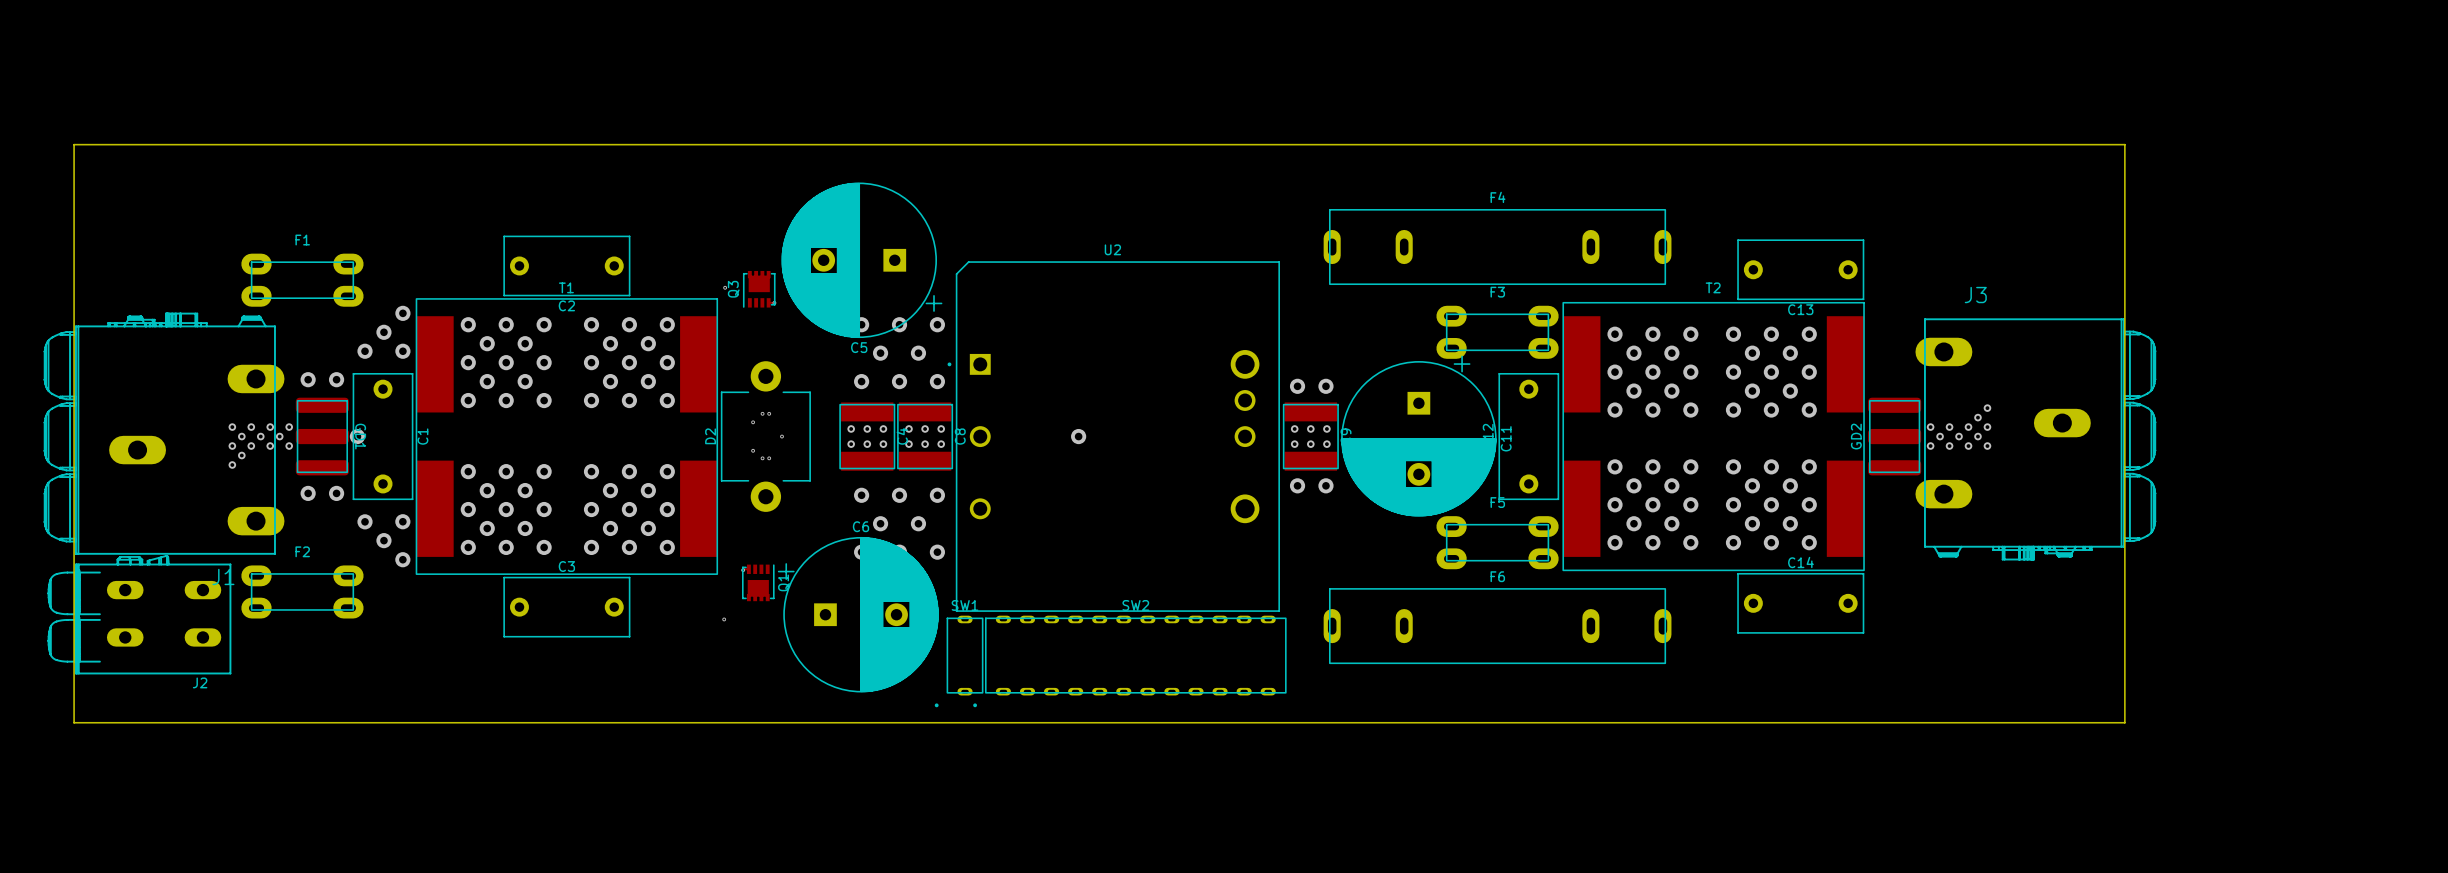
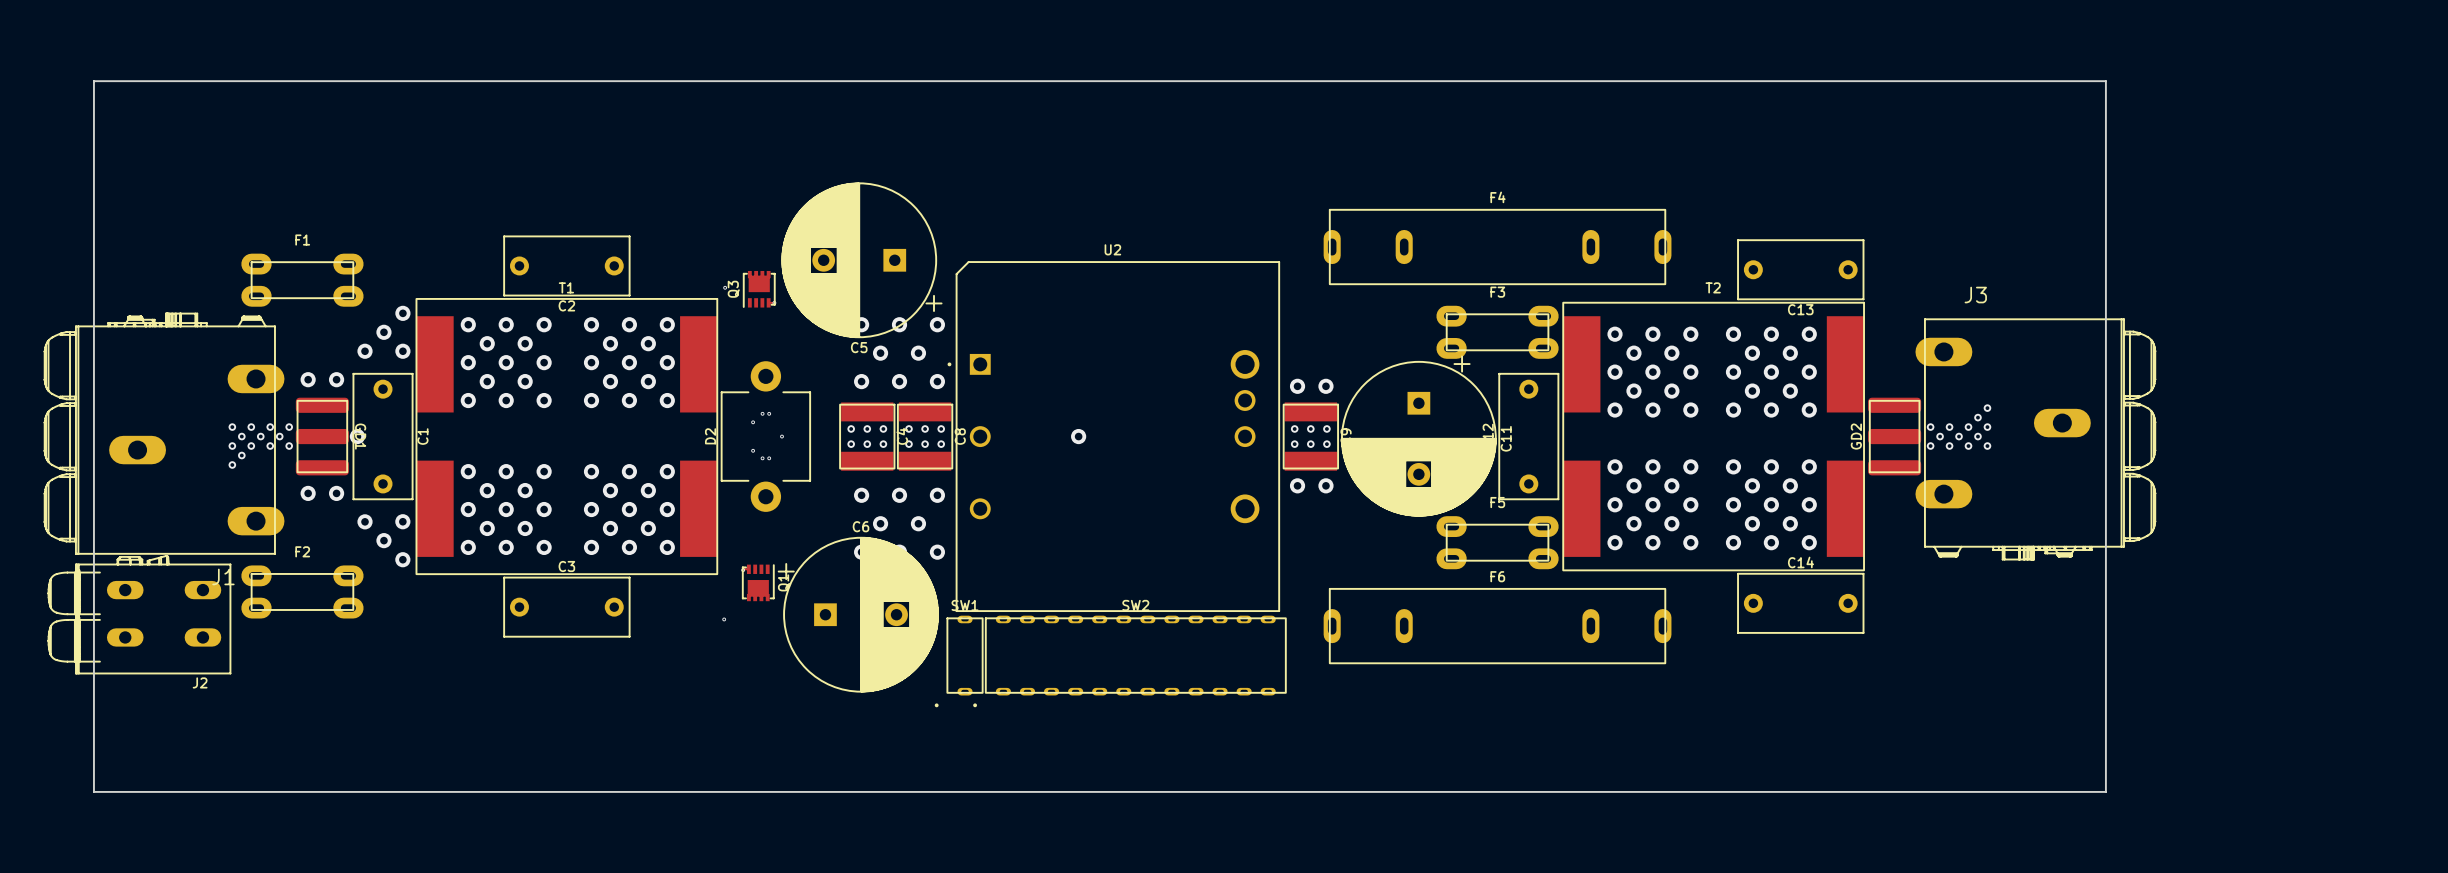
board edge: (74, 144) (2124, 144) (2124, 722) (74, 722) (74, 144) -> (93, 81) (93, 791) (2105, 791) (2105, 81) (93, 81)

